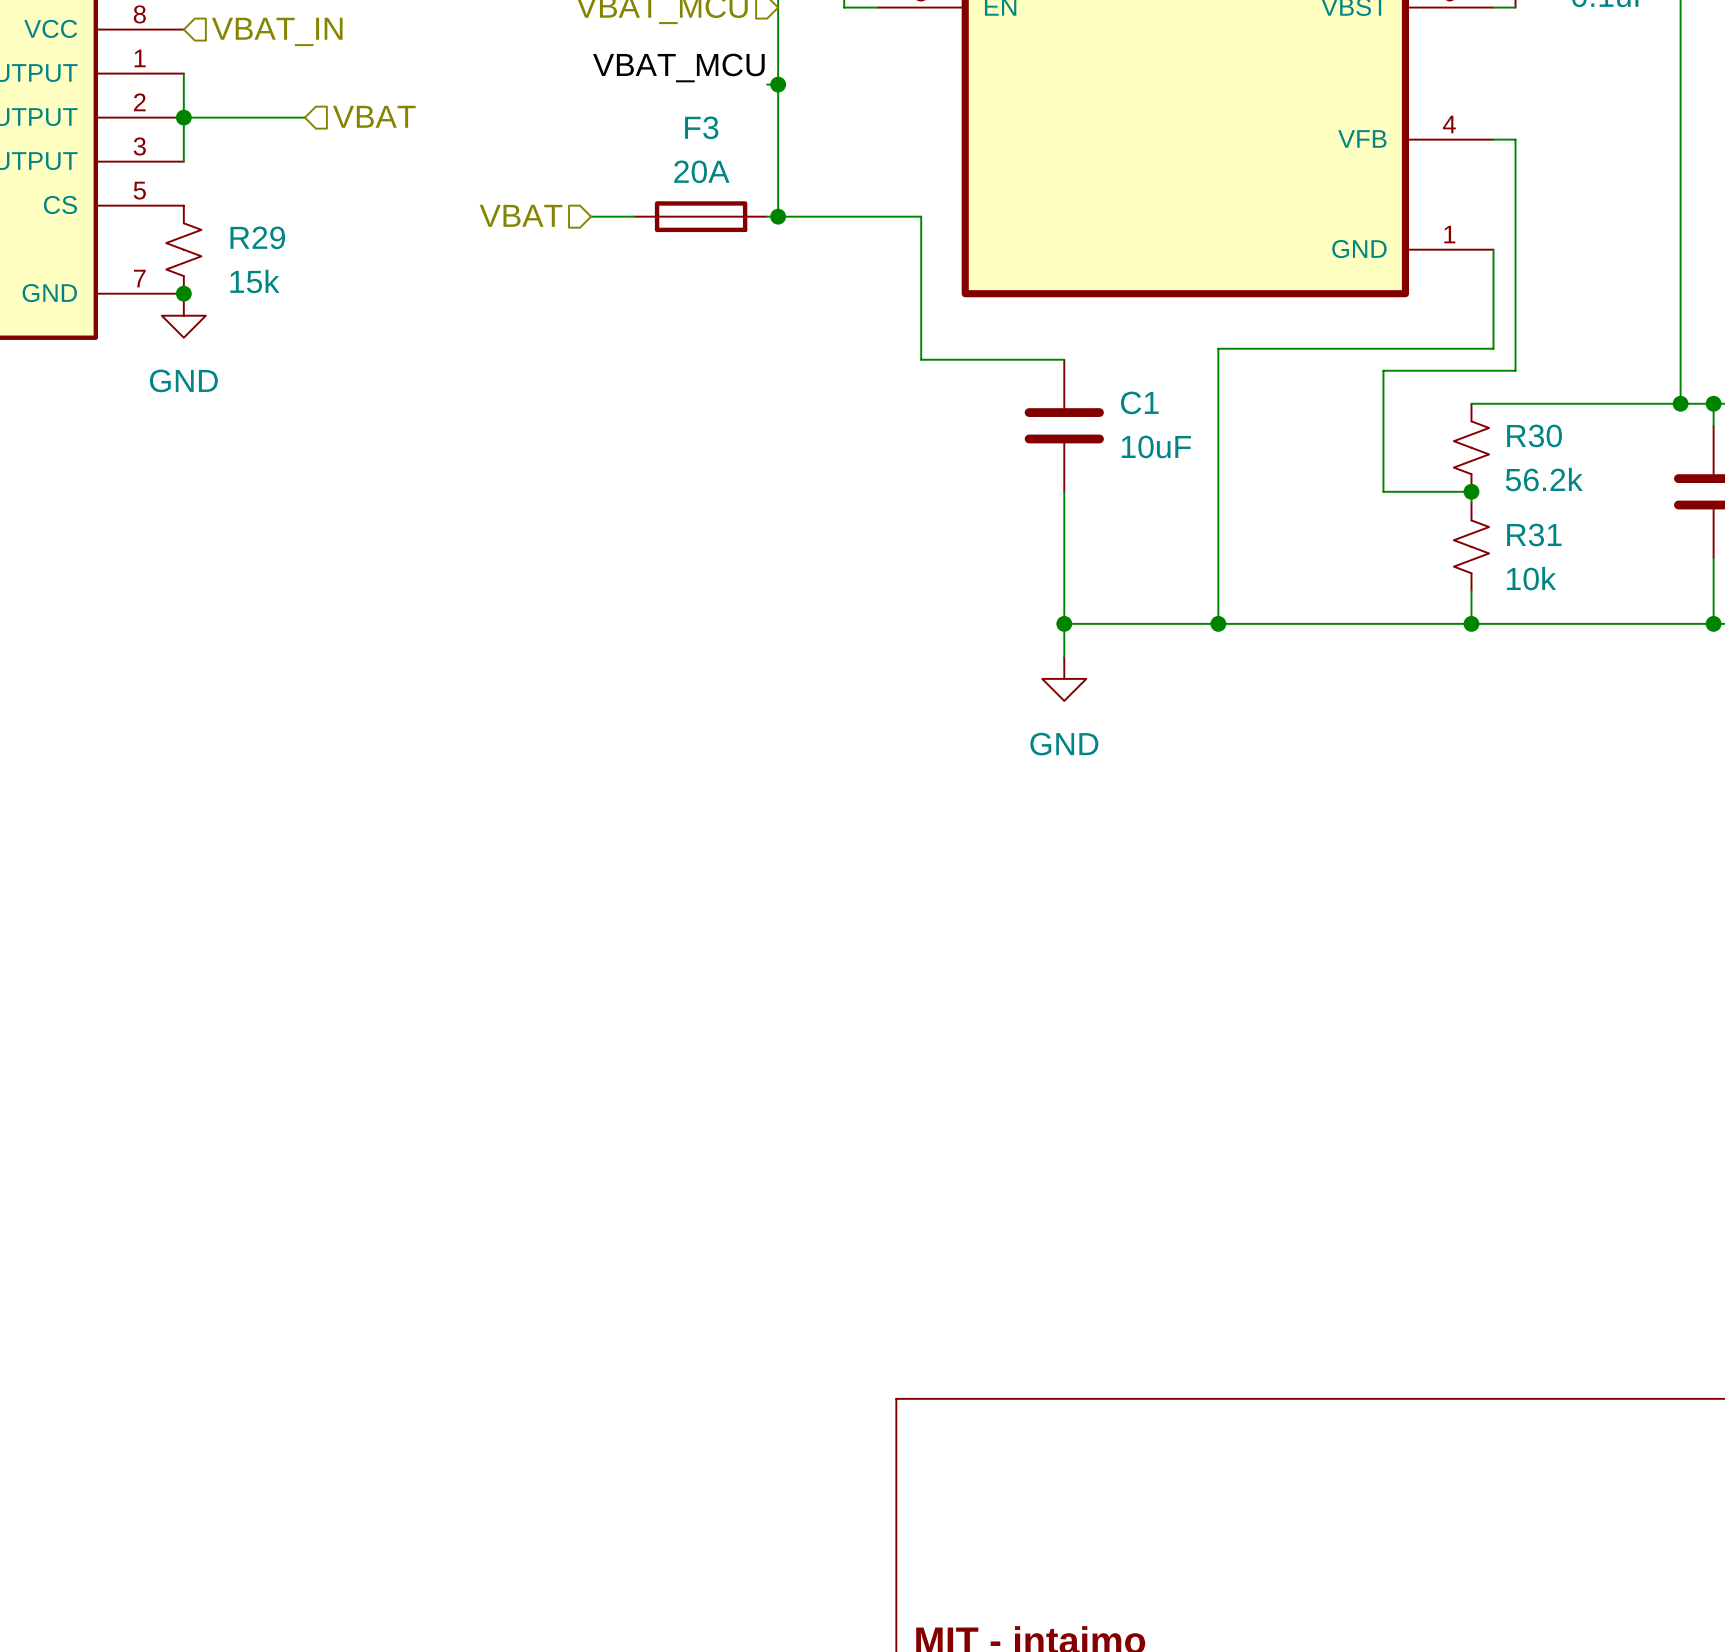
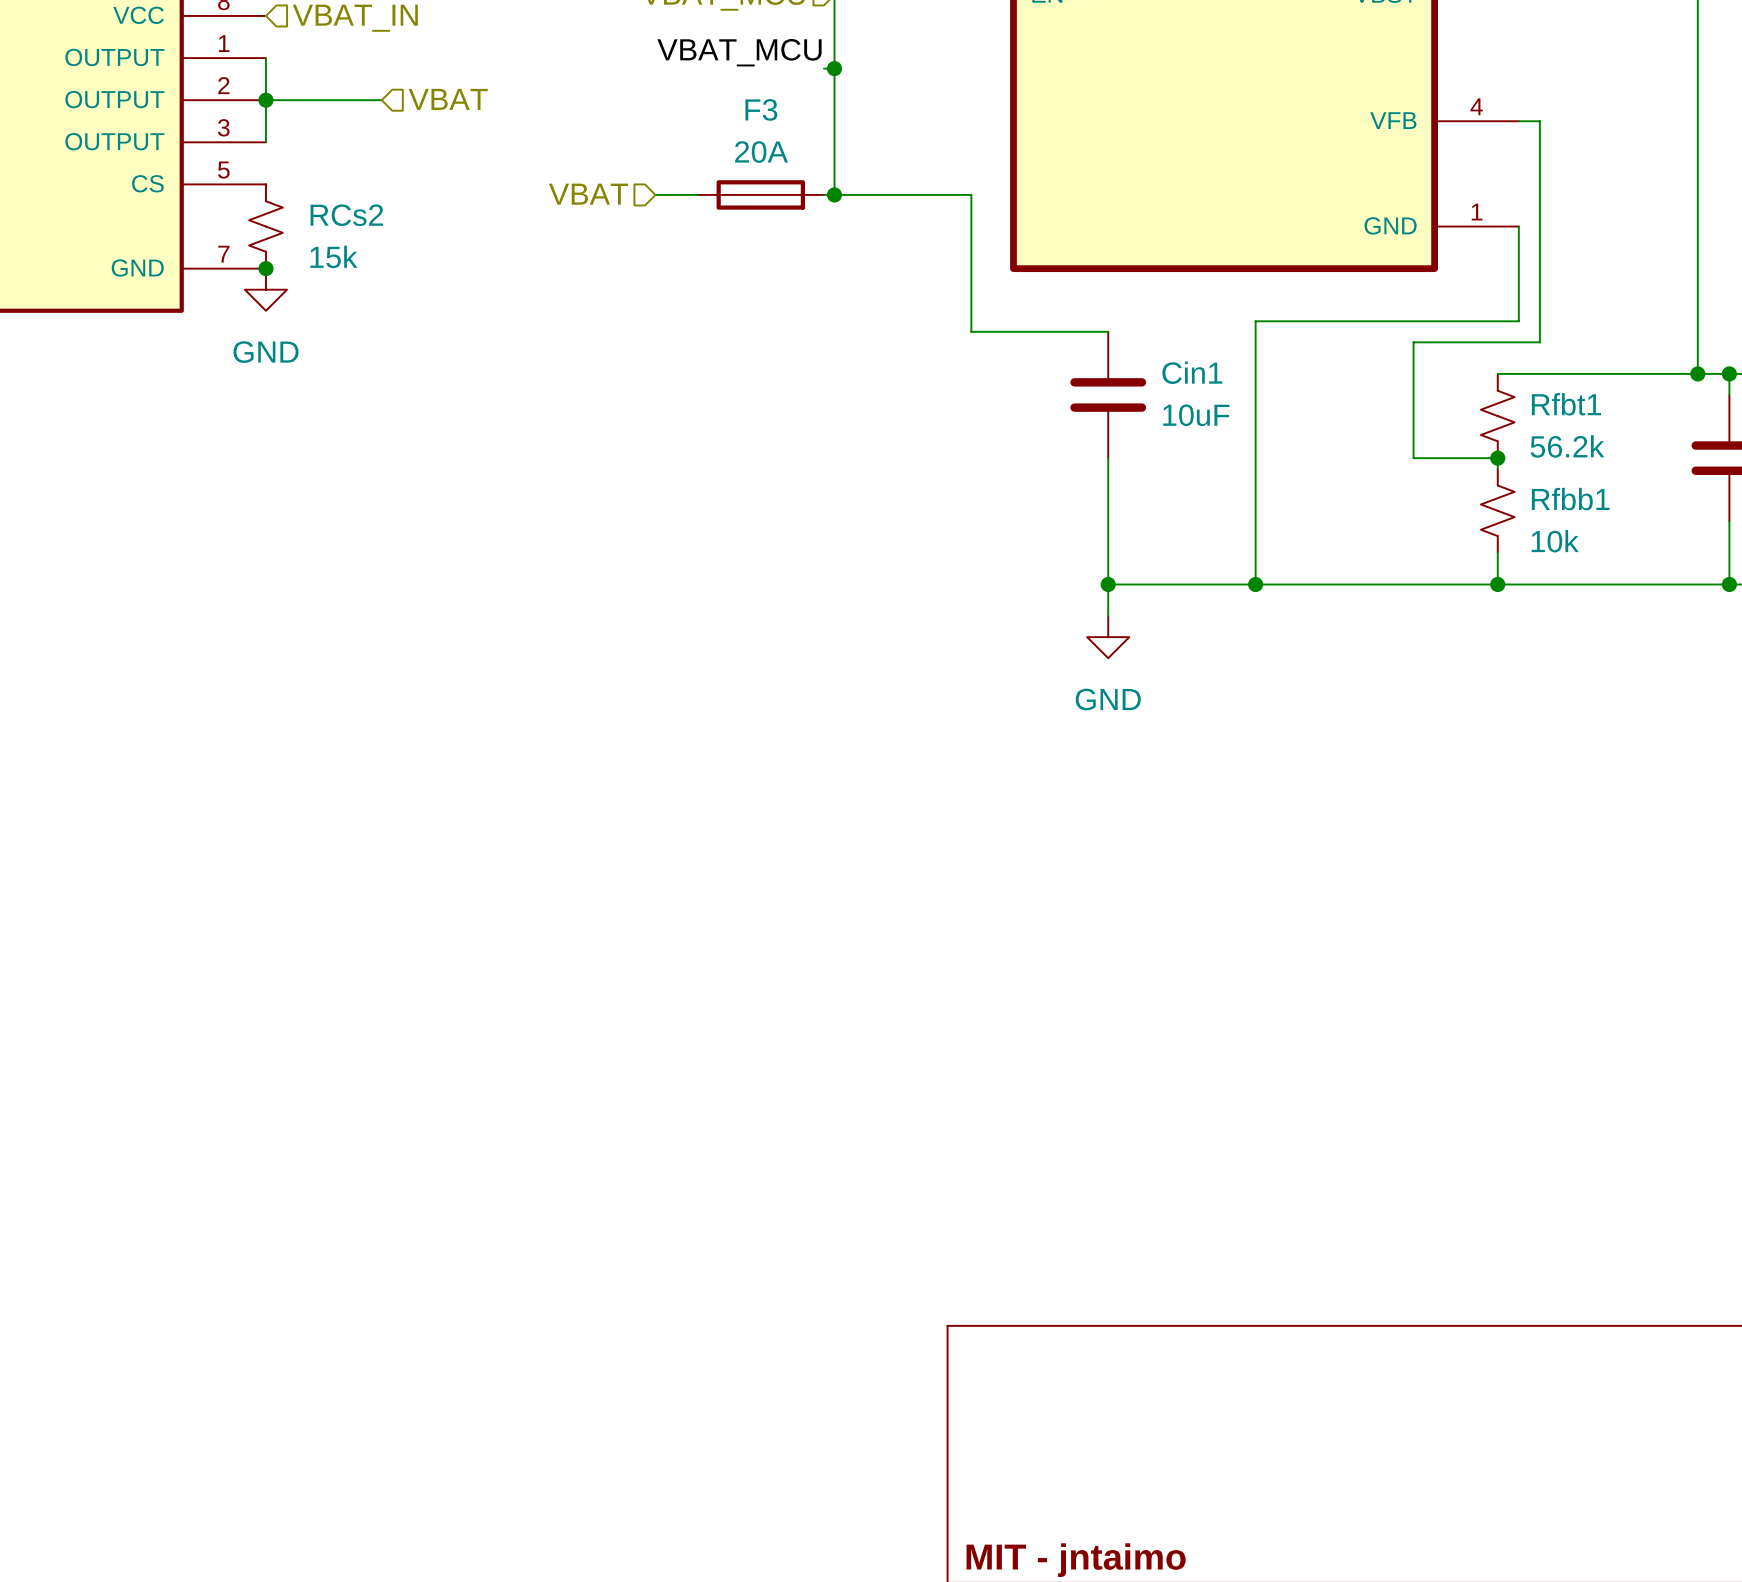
R29 name: R29 (257, 237) -> RCs2 (346, 215)
C1 name: C1 (1139, 402) -> Cin1 (1192, 372)
R30 name: R30 (1534, 435) -> Rfbt1 (1566, 404)
R31 name: R31 (1534, 535) -> Rfbb1 (1570, 499)

